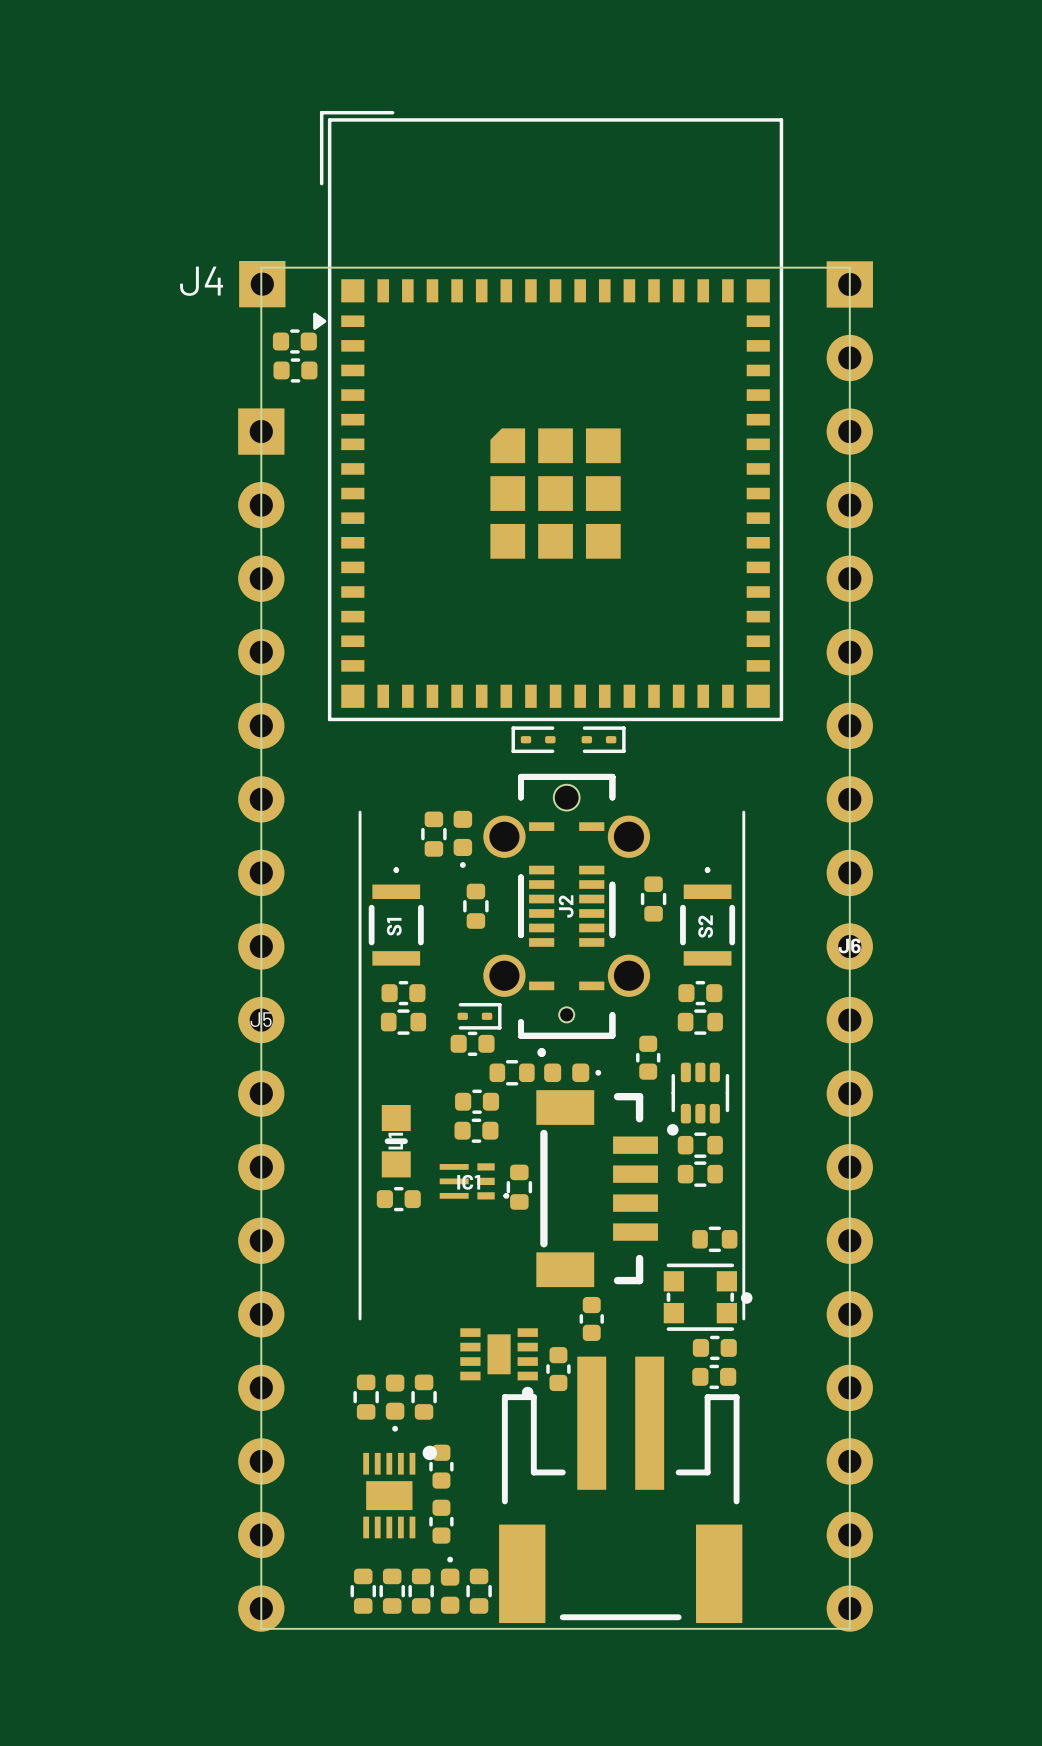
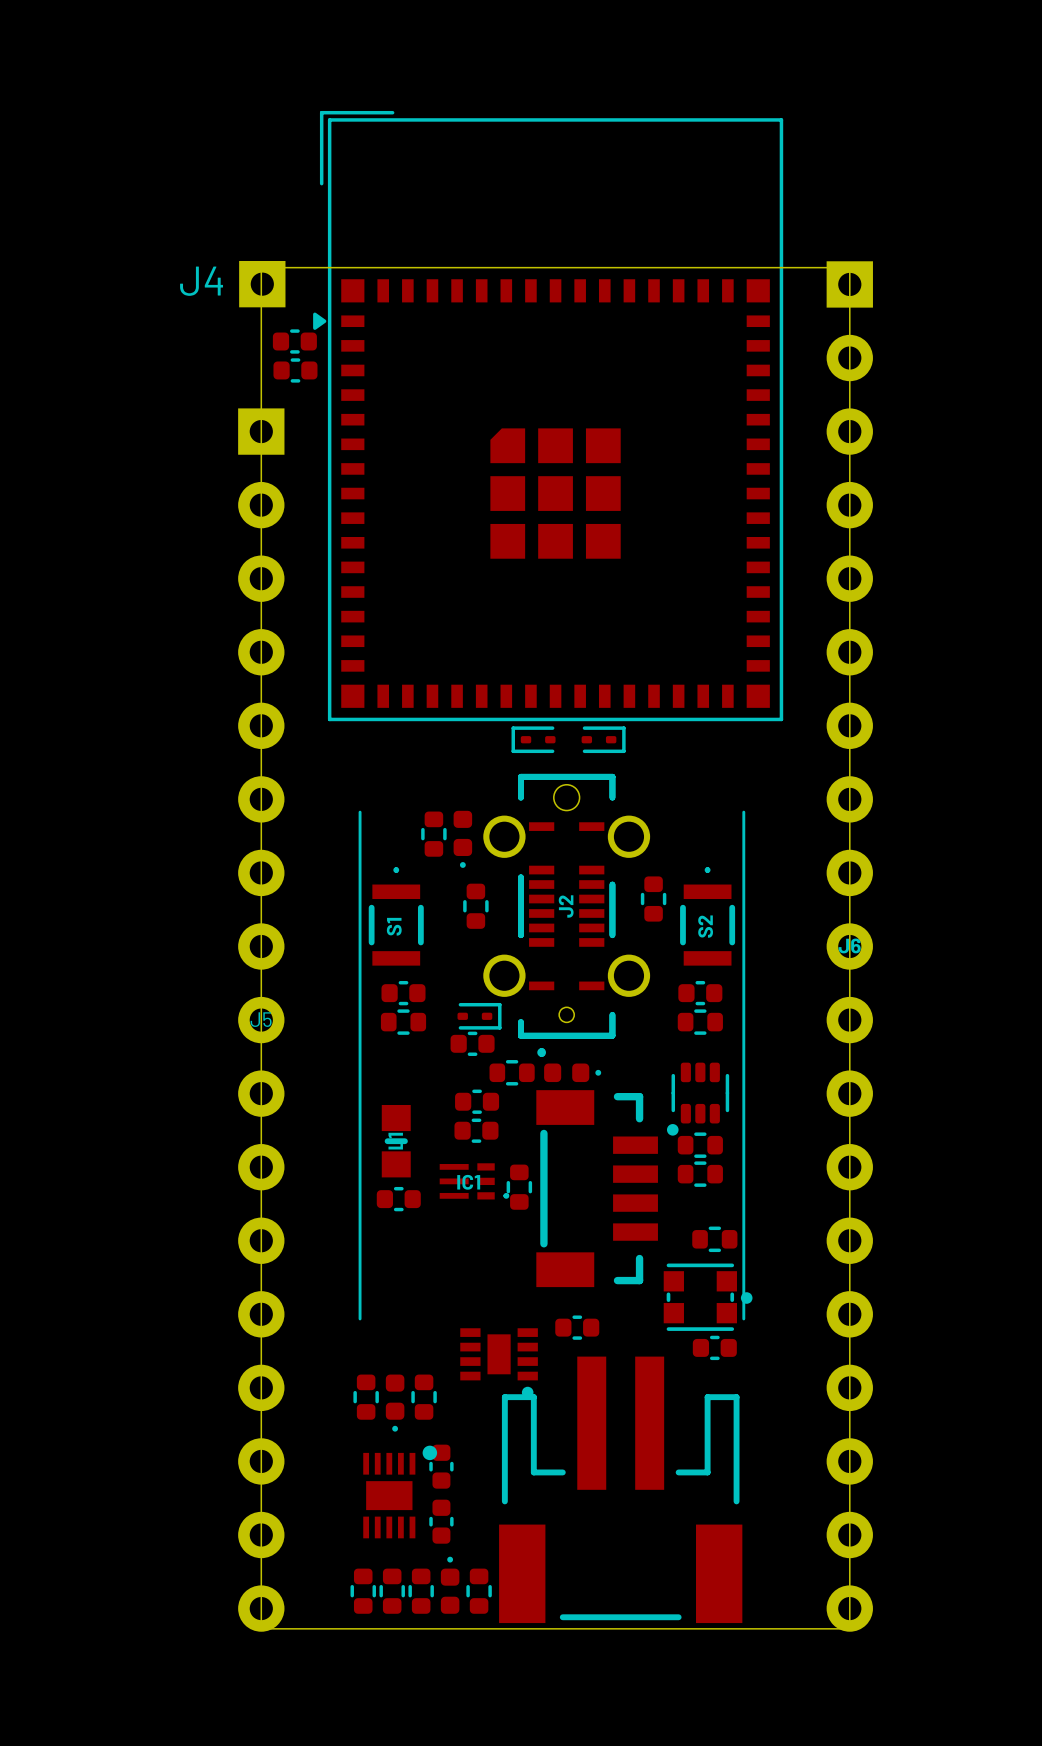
part: (648, 1057) -> none
part rotation: 0° (591, 1318) -> 90° clockwise (577, 1327)
part: (558, 1369) -> none
part: (714, 1376) -> none

